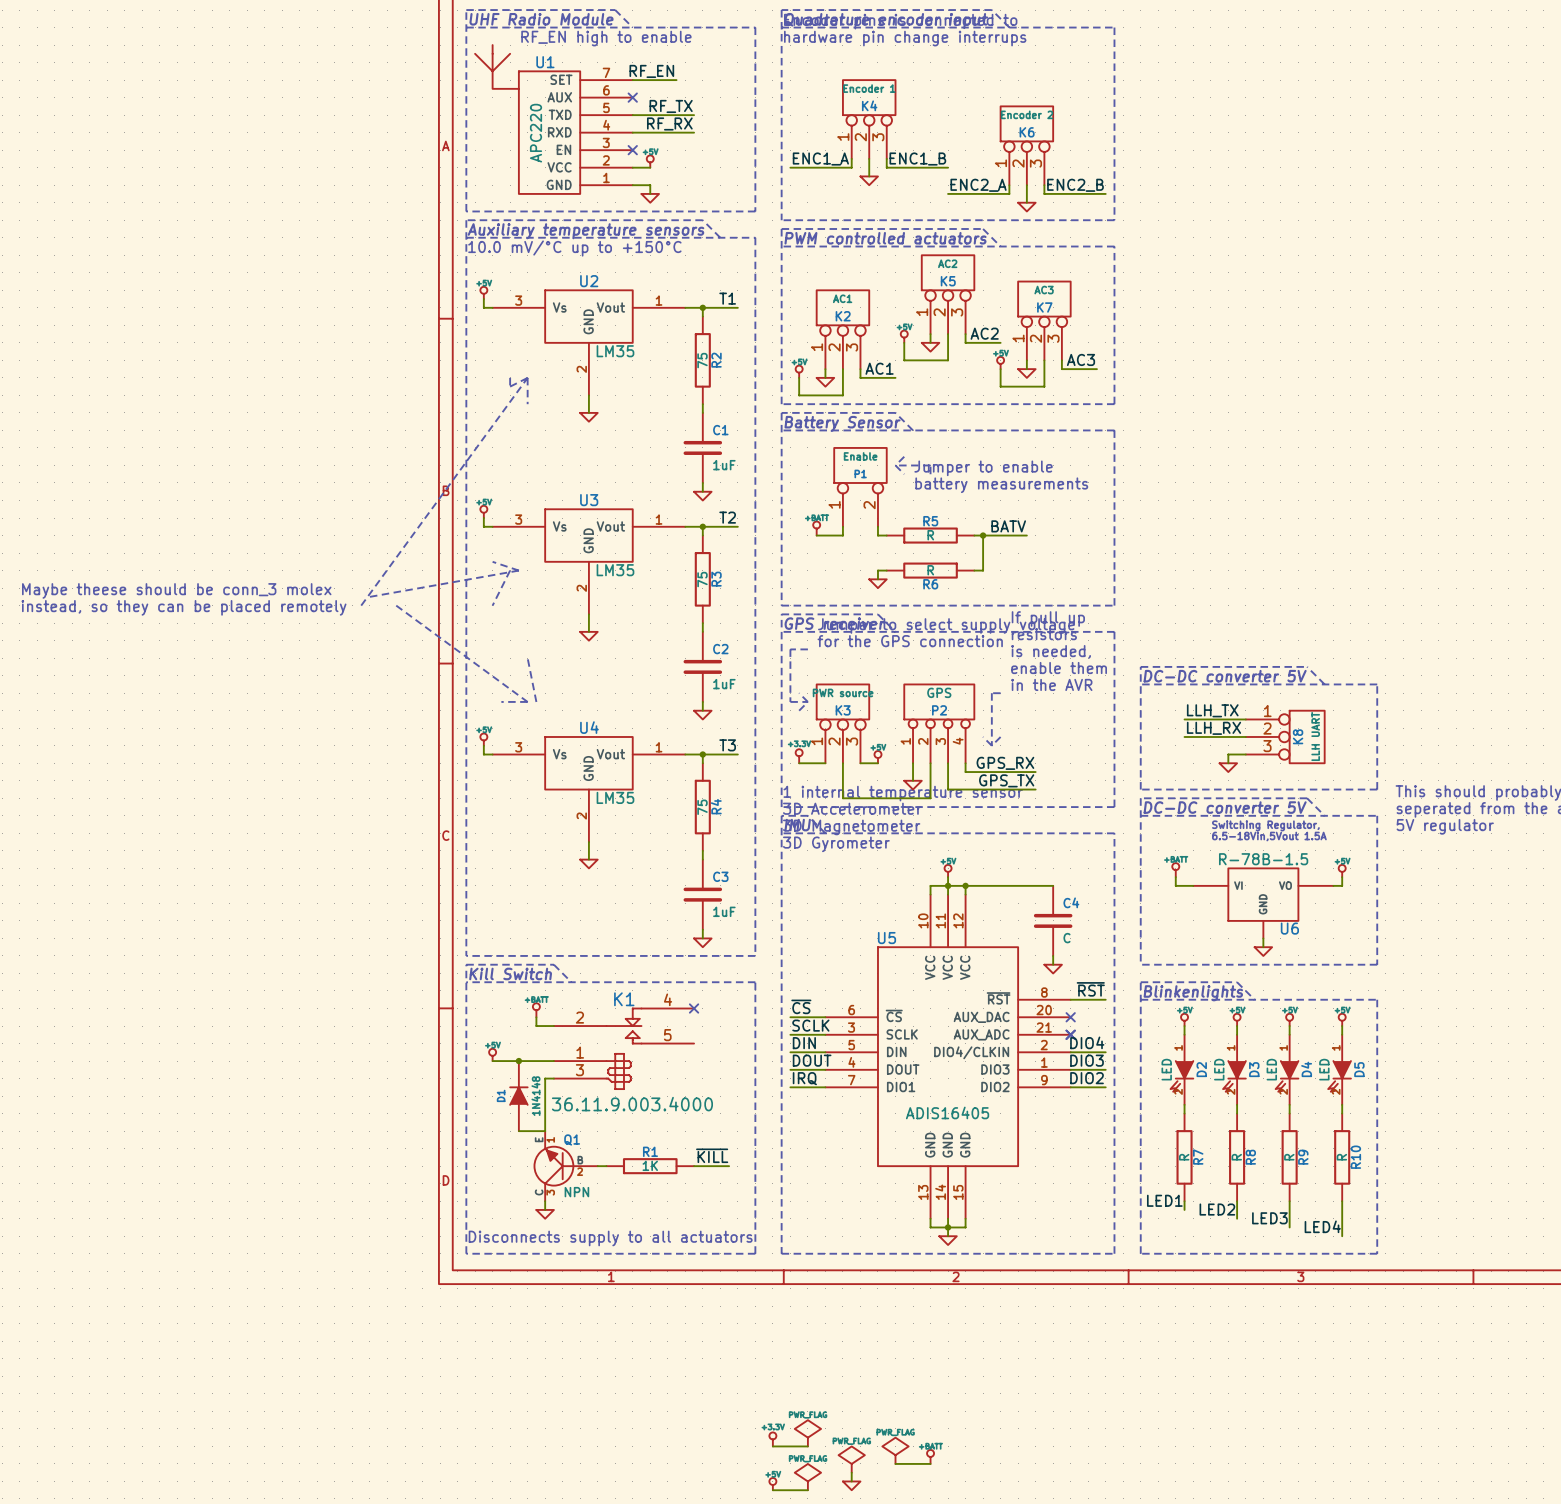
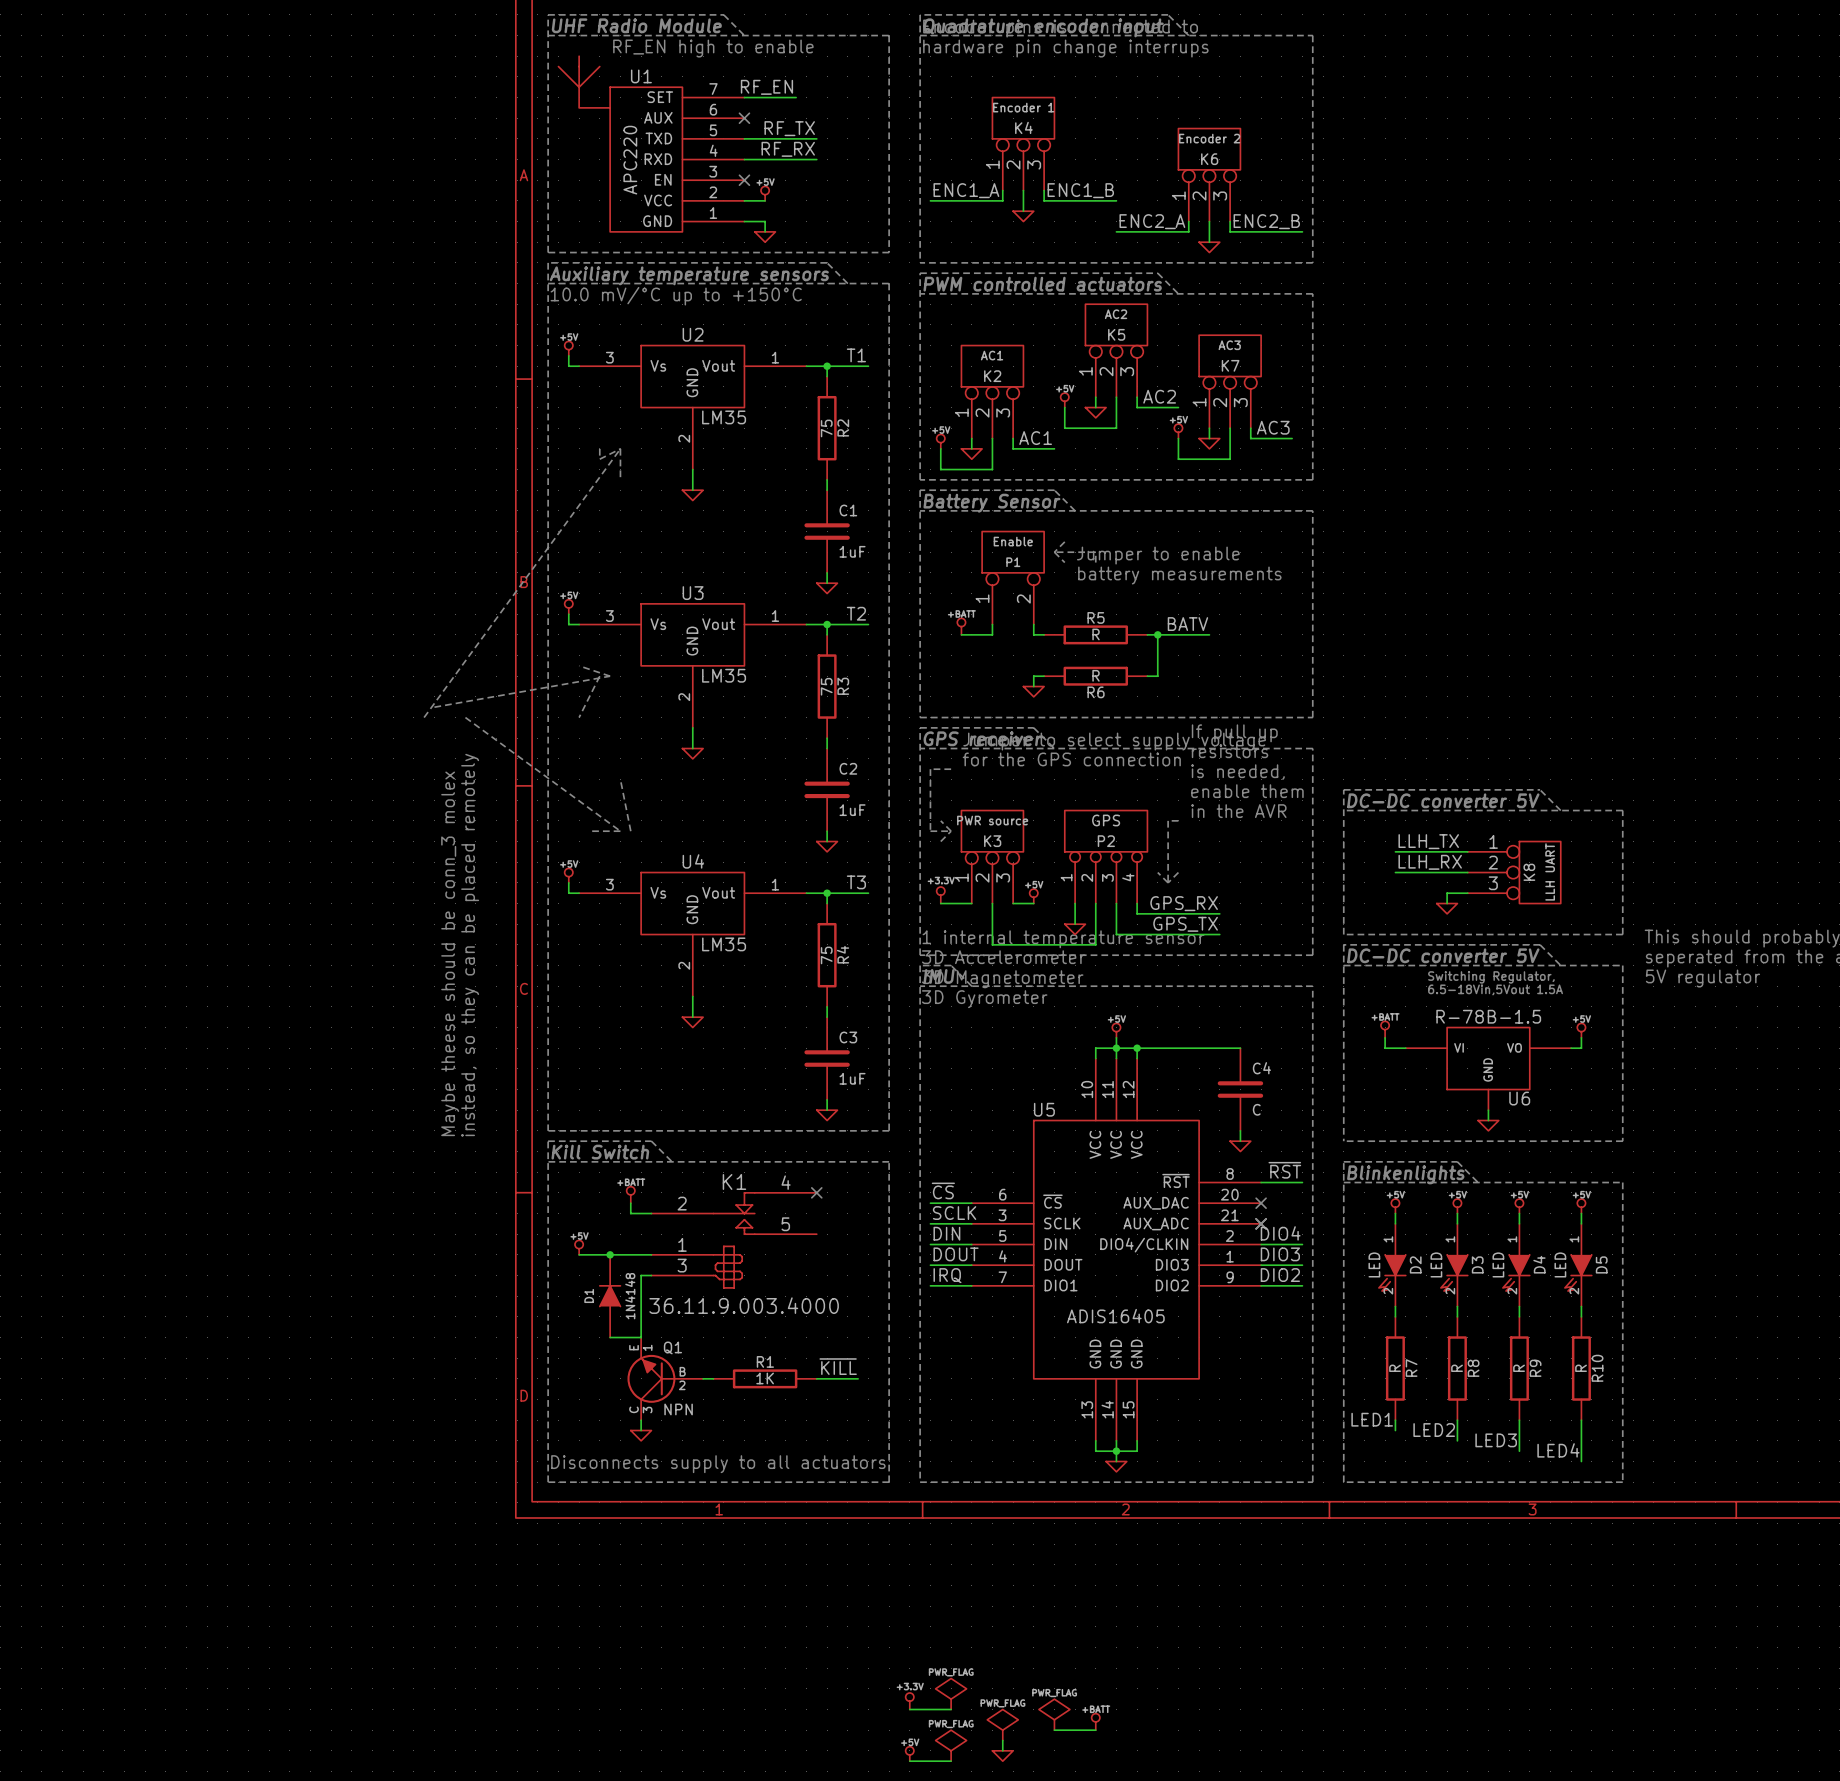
text: Maybe theese should be conn_3 molex (176, 590) -> none
text: instead, so they can be placed remotely (183, 607) -> none
text: none -> instead, so they can be placed remotely (470, 945)
text: none -> Maybe theese should be conn_3 molex (450, 953)

